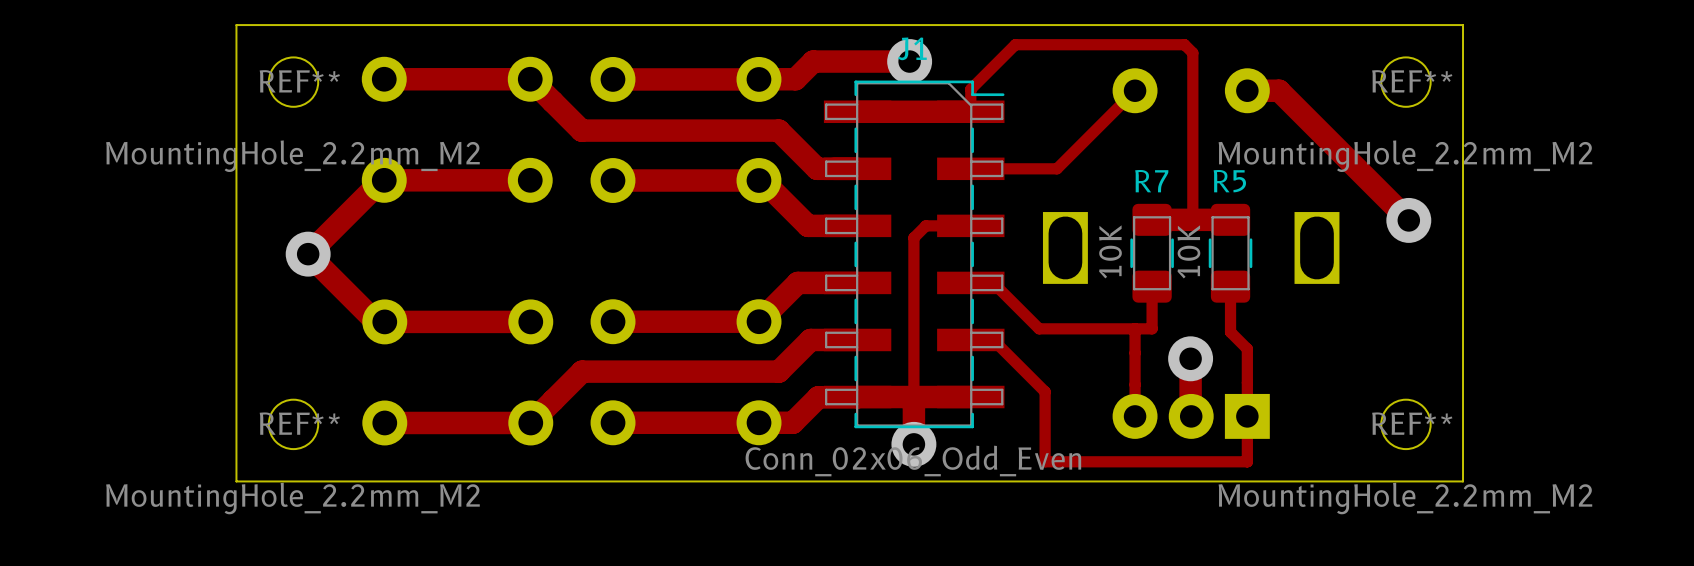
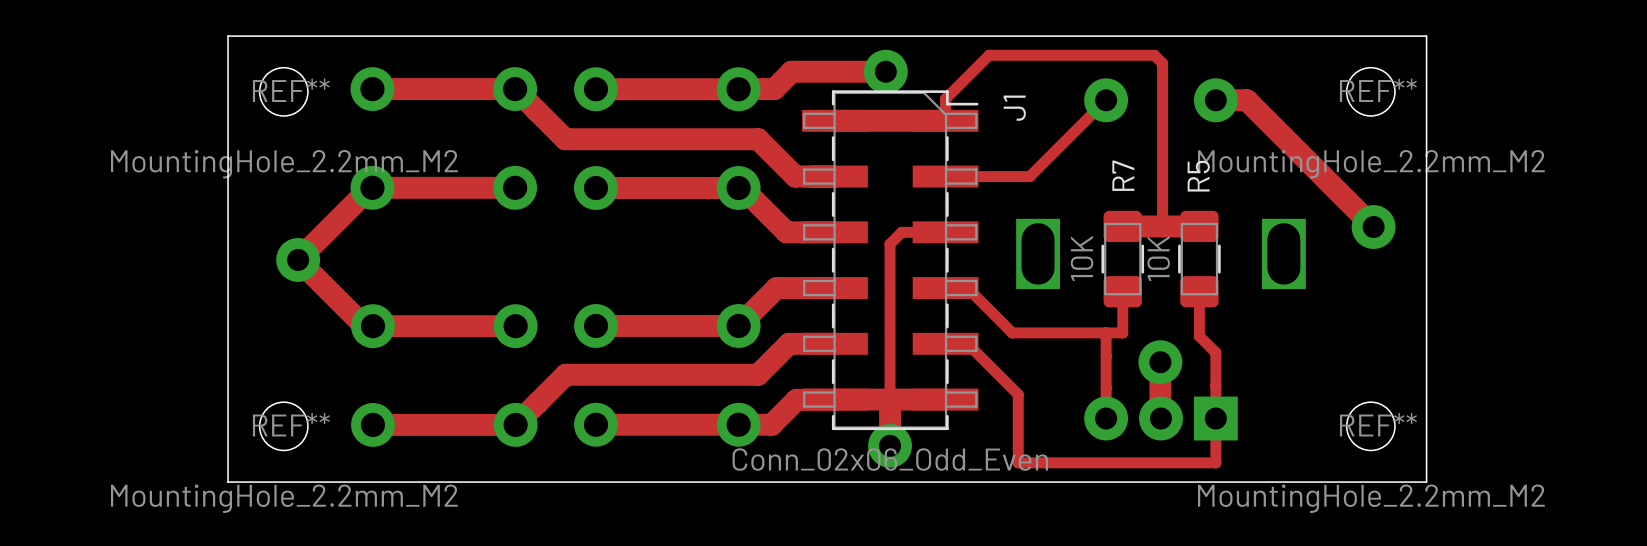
J1 name rotation: 0° (912, 48) -> 90° counterclockwise (1014, 108)
J1 name position: J1 (912, 48) -> J1 (1014, 108)
R7 name rotation: 0° (1151, 181) -> 90° counterclockwise (1123, 175)
R5 name rotation: 0° (1229, 181) -> 90° counterclockwise (1198, 176)

